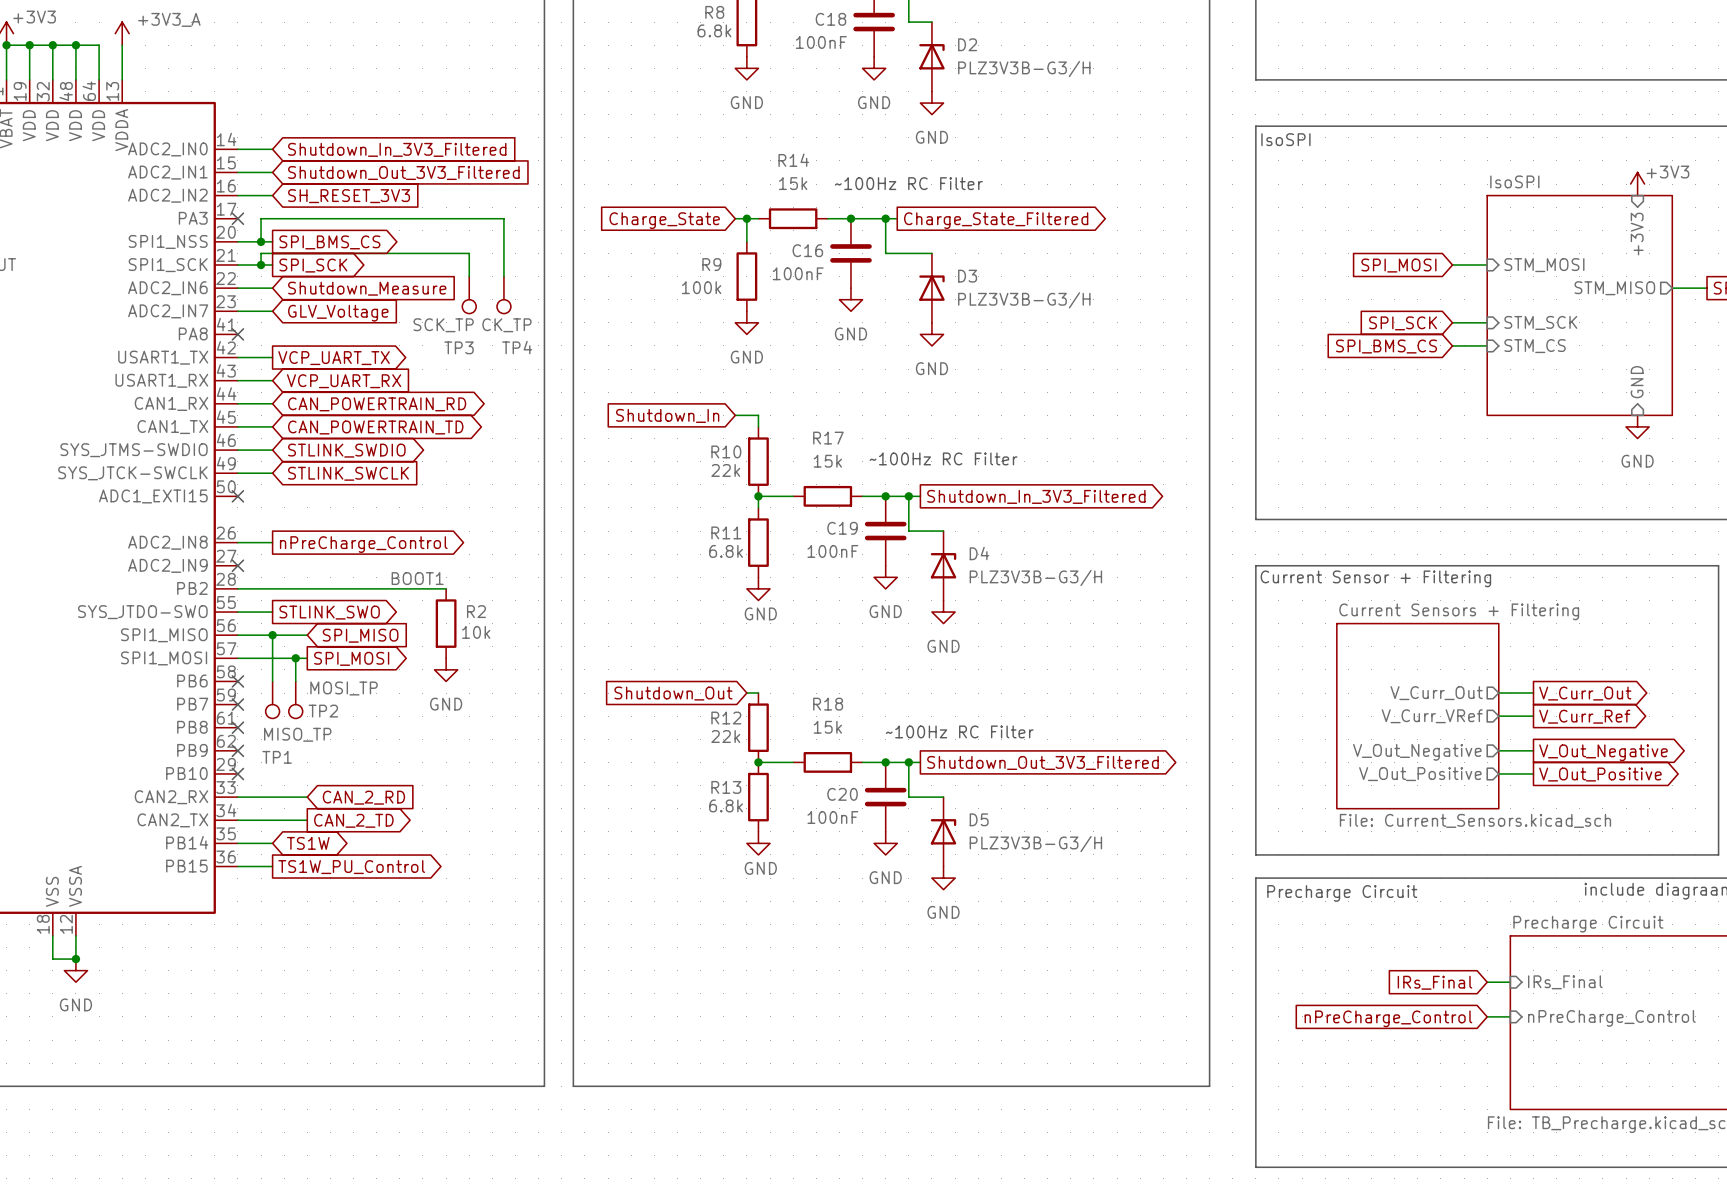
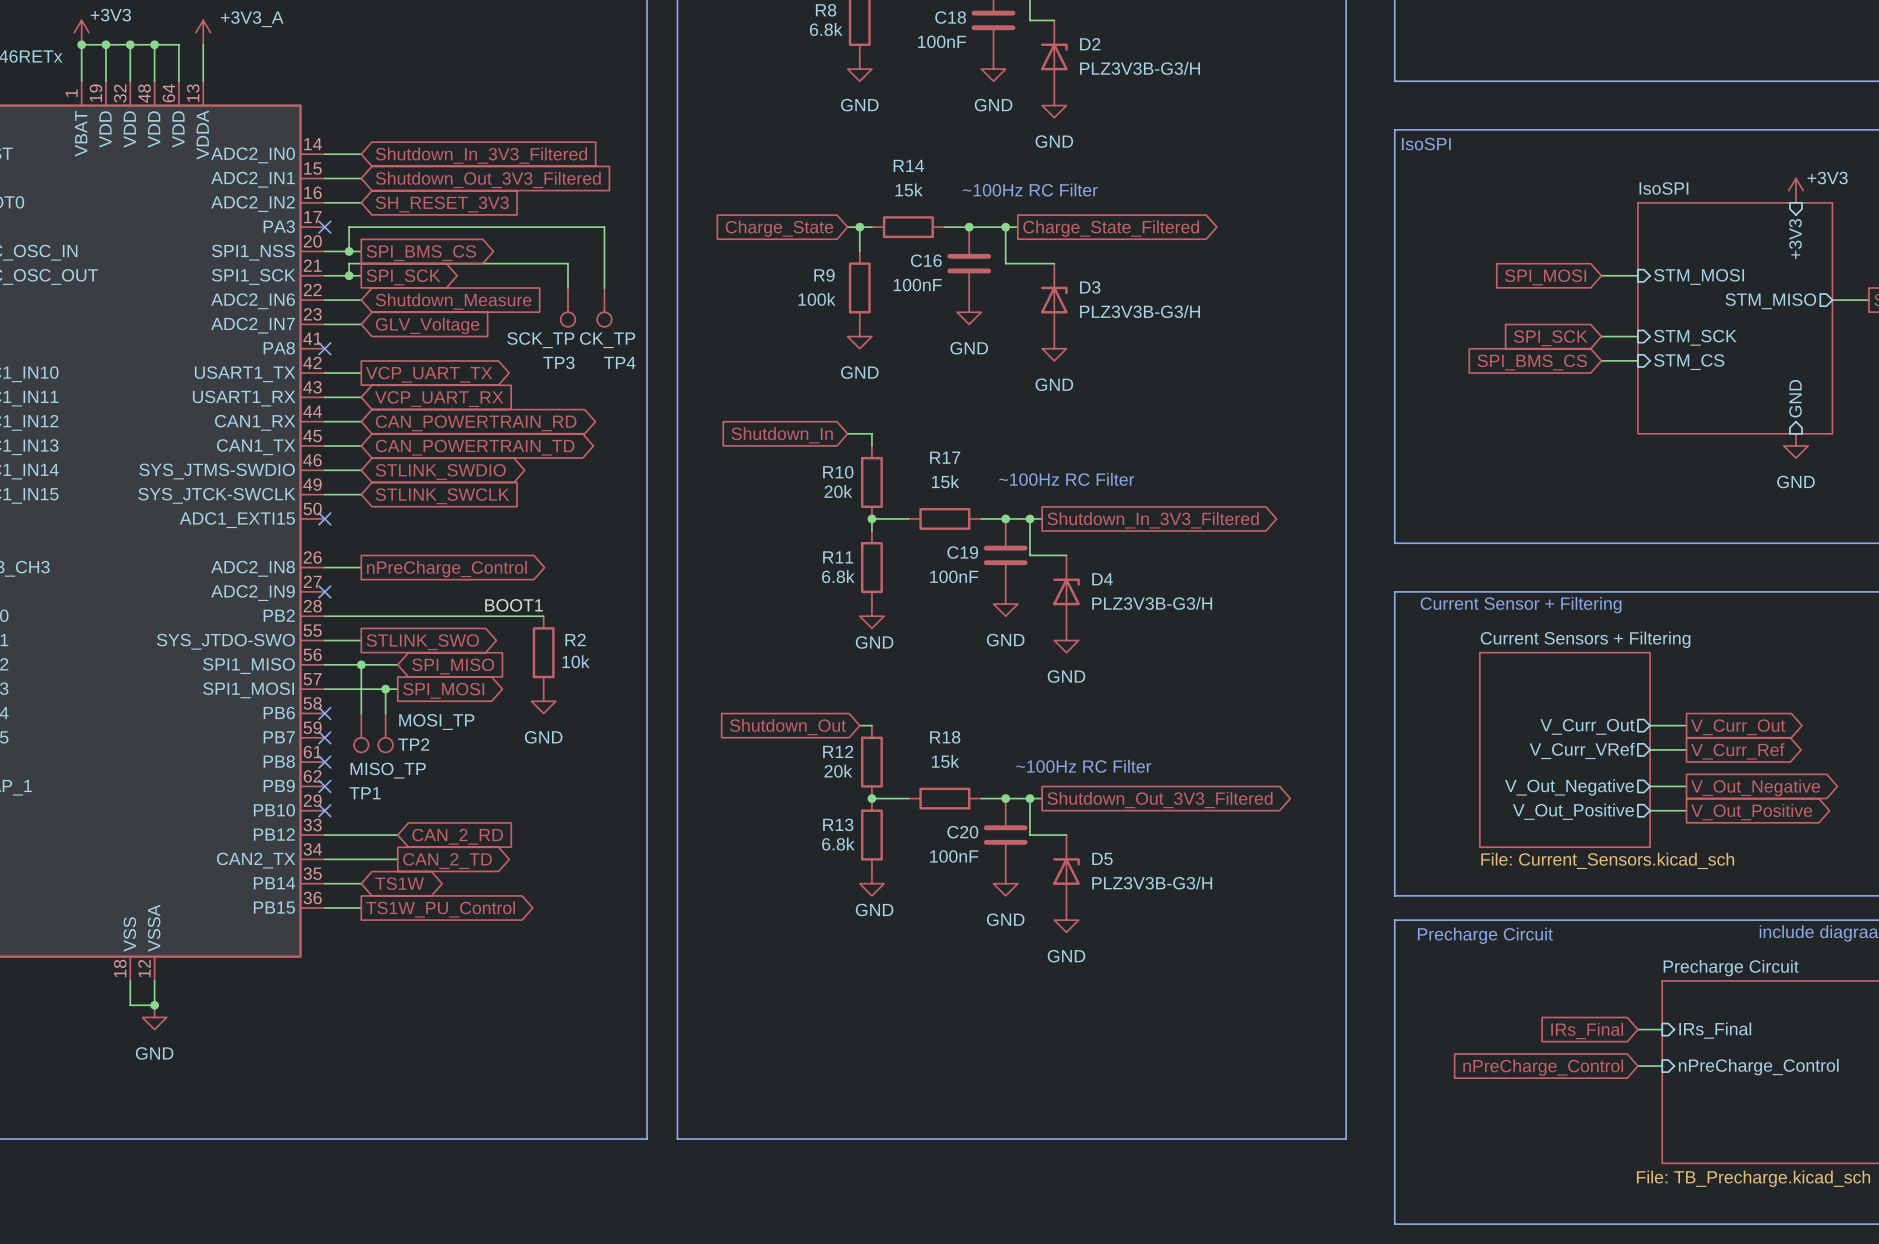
R10 value: 22k (725, 470) -> 20k (838, 491)
R12 value: 22k (725, 736) -> 20k (838, 771)
part pin name: CAN2_RX (171, 797) -> PB12 (274, 834)

